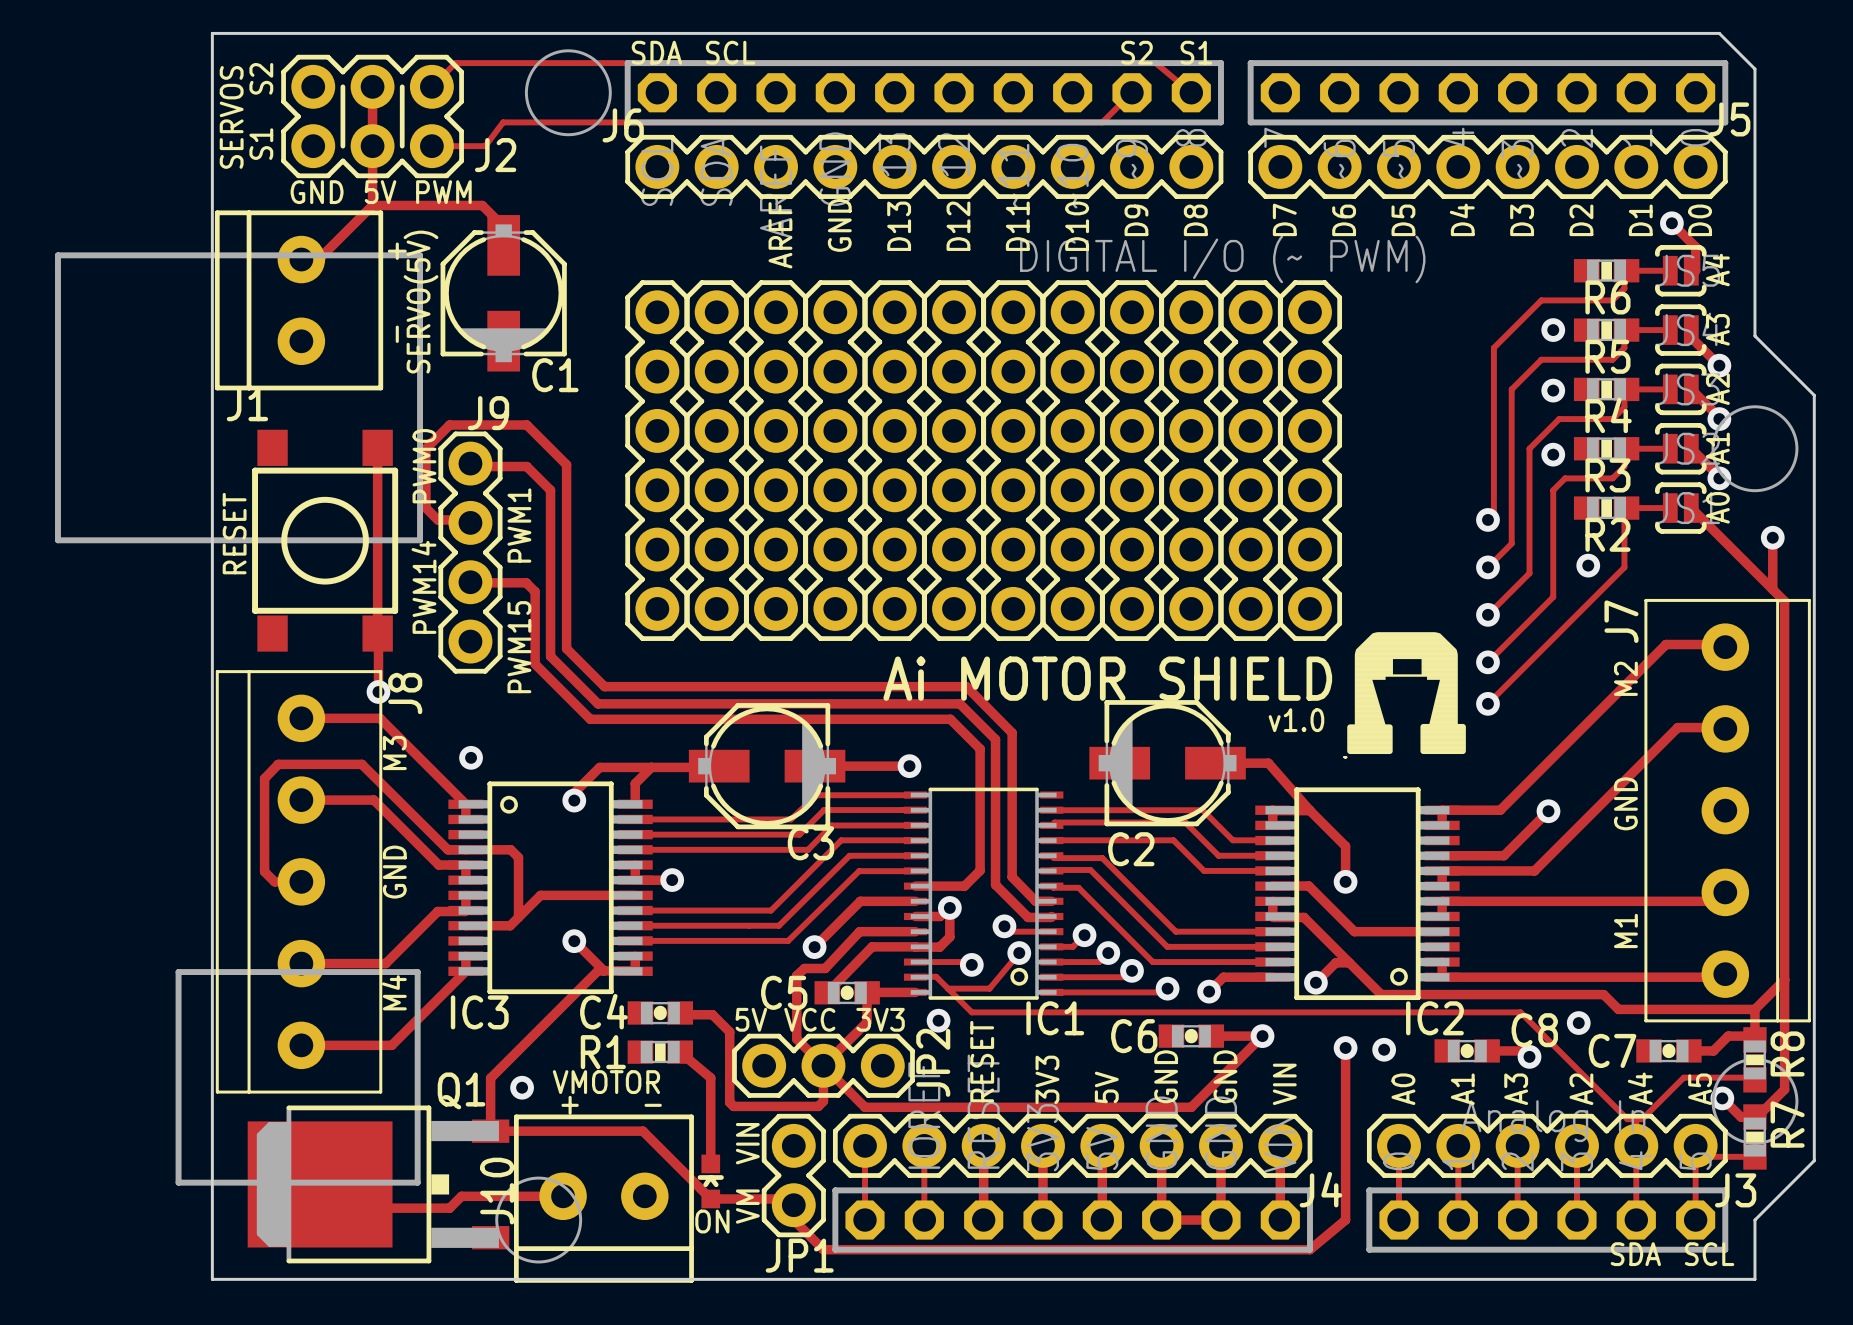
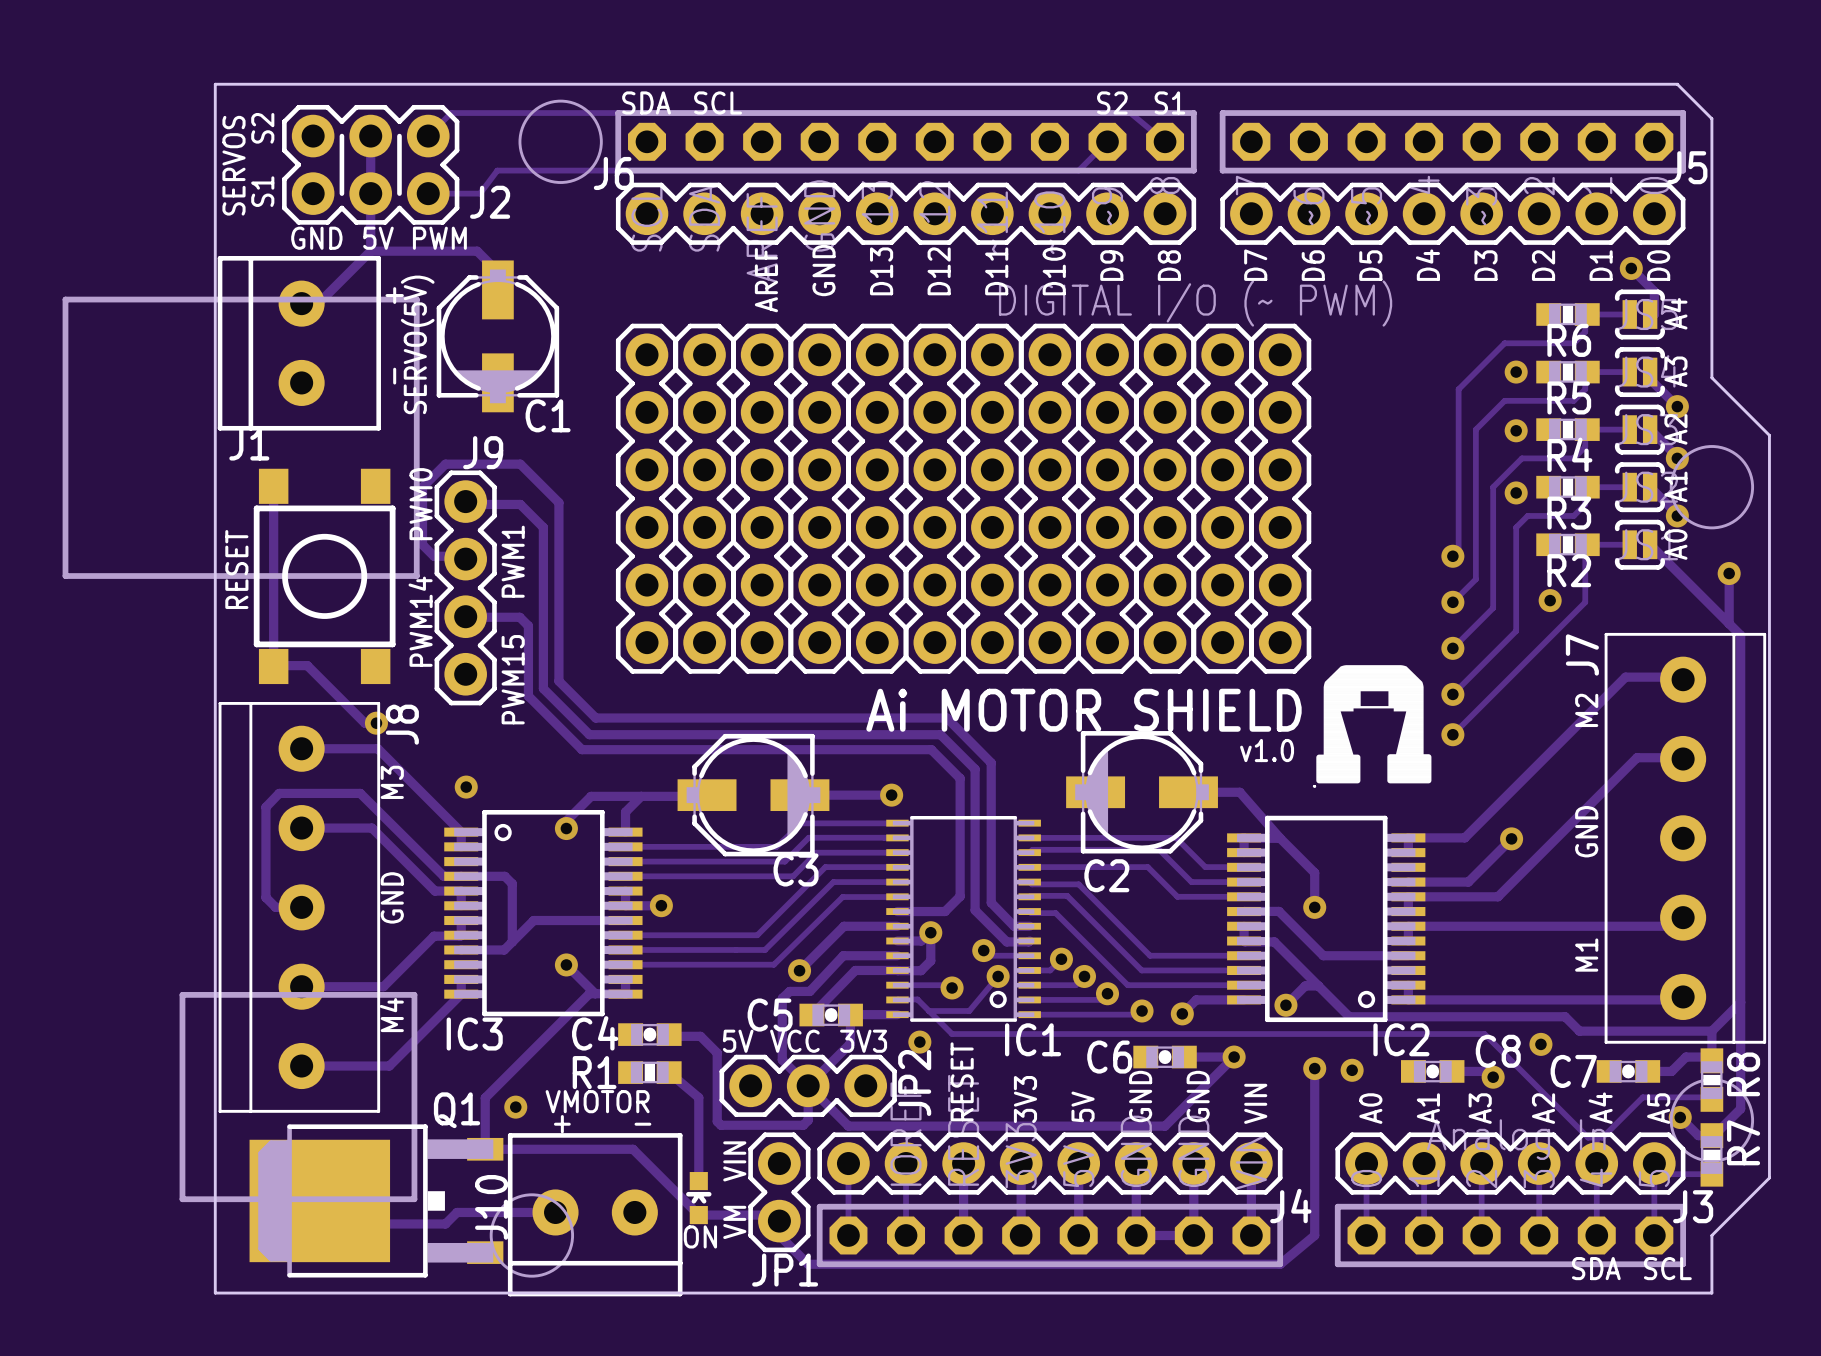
track: (377, 447) (378, 691) -> (273, 483) (273, 663) (275, 665) (307, 665) (364, 723) (376, 723)

